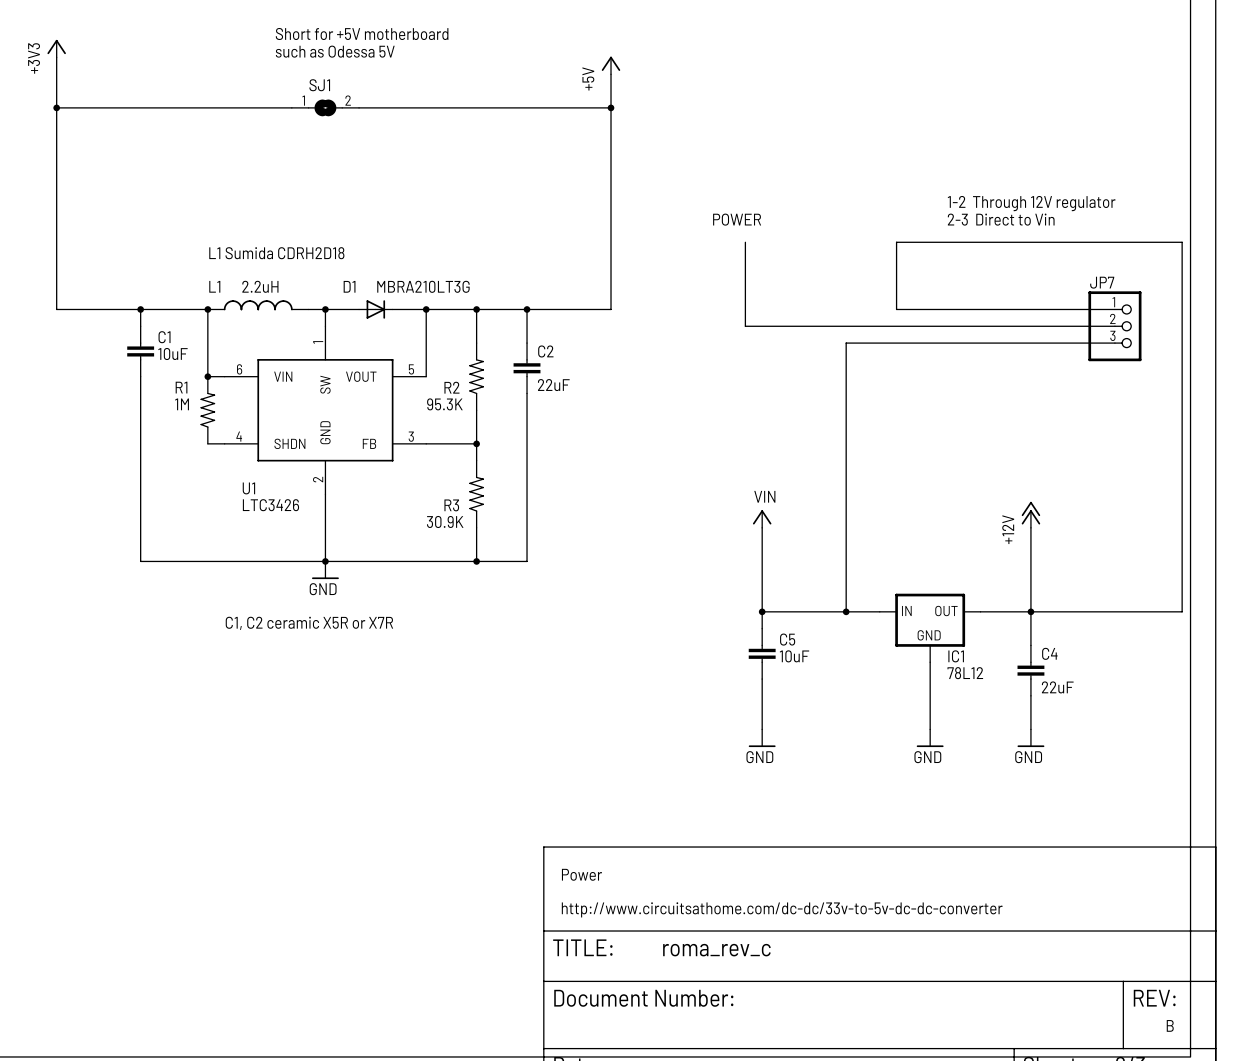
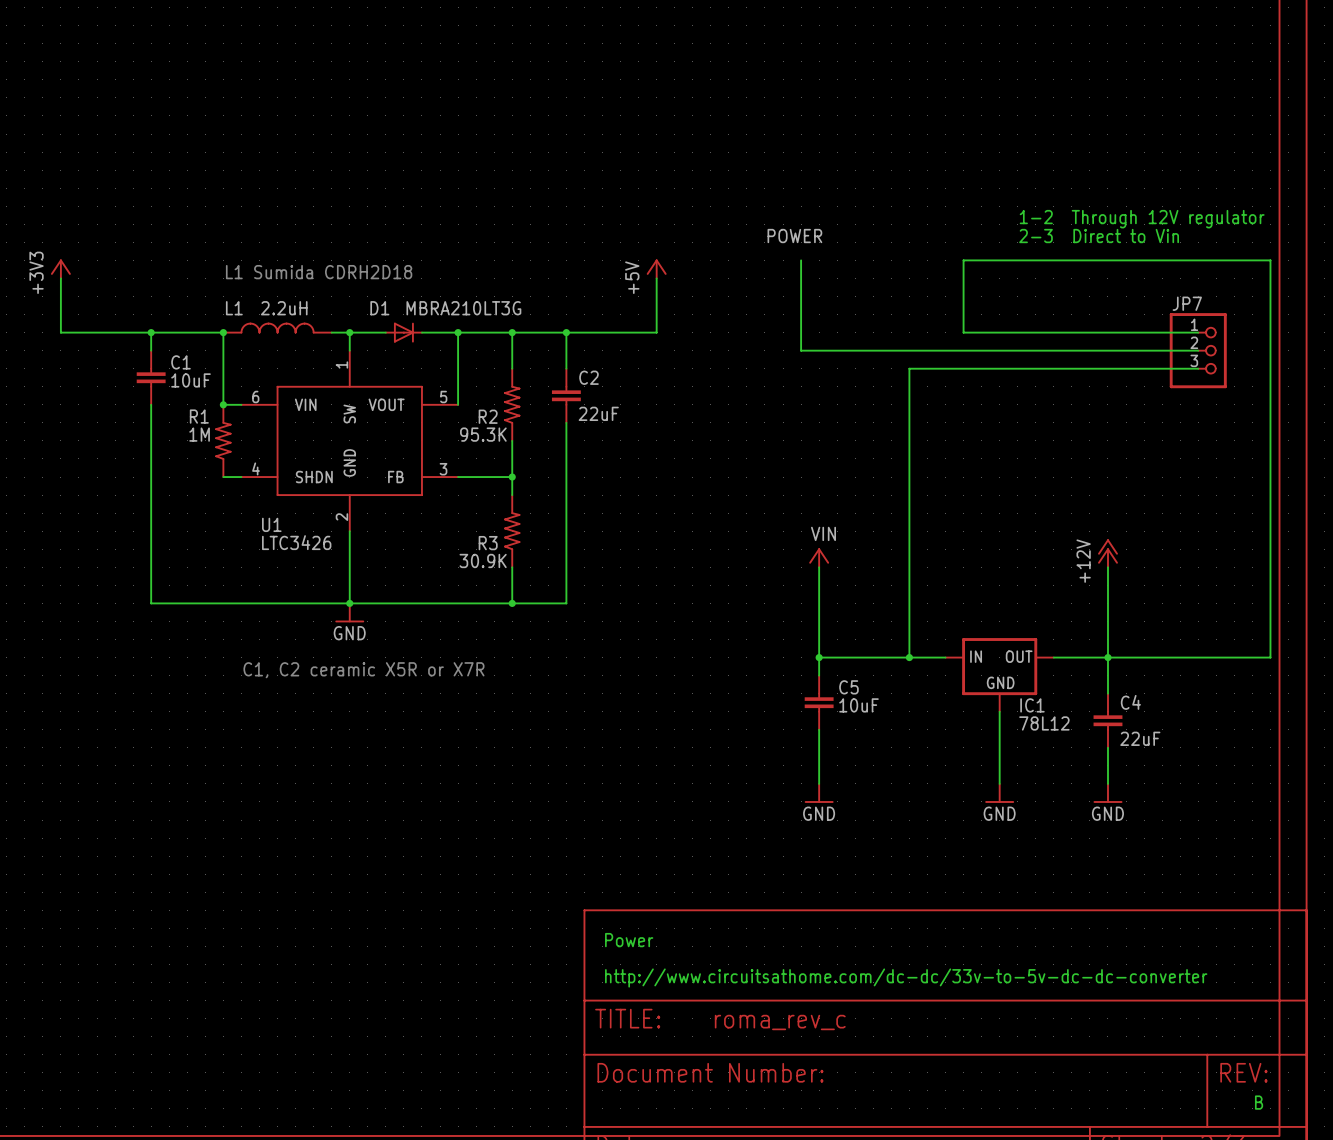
text: Short for +5V motherboard (362, 34) -> none
power symbol: +3V3 (56, 48) -> none
text: such as Odessa 5V (335, 51) -> none
wire: (56, 57) (56, 259) -> none
power symbol: +5V (611, 65) -> none
wire: (611, 74) (611, 259) -> none
wire: (56, 107) (291, 107) -> none
junction: (56, 107) -> none
SJ1: (325, 107) -> none
wire: (359, 107) (611, 107) -> none
junction: (611, 107) -> none
power symbol: none -> +3V3 (60, 268)
power symbol: none -> +5V (656, 268)

